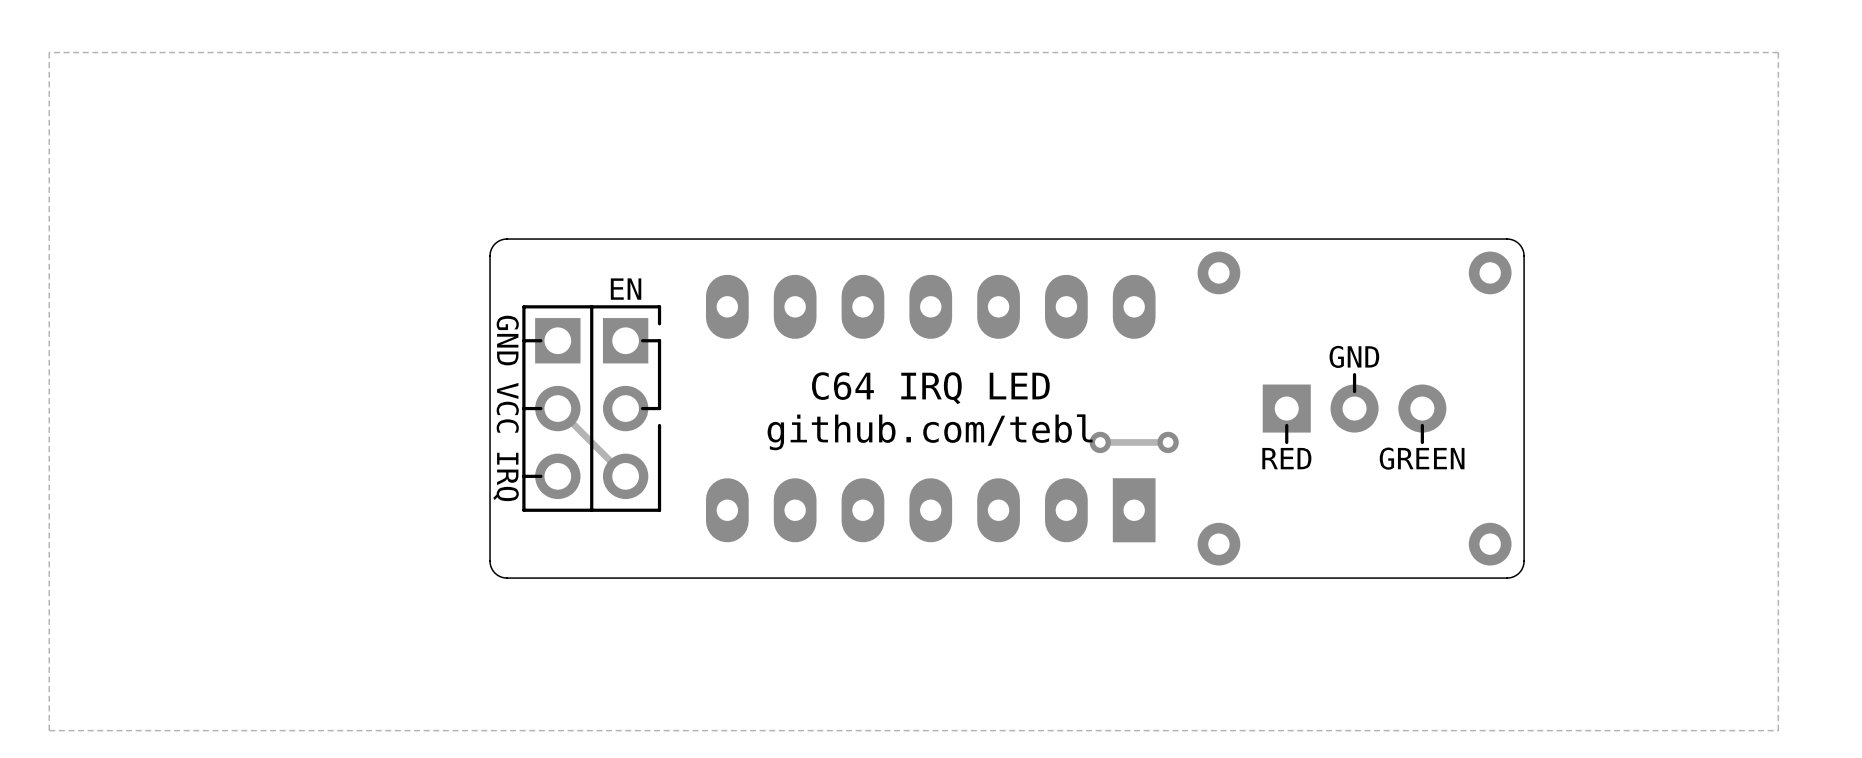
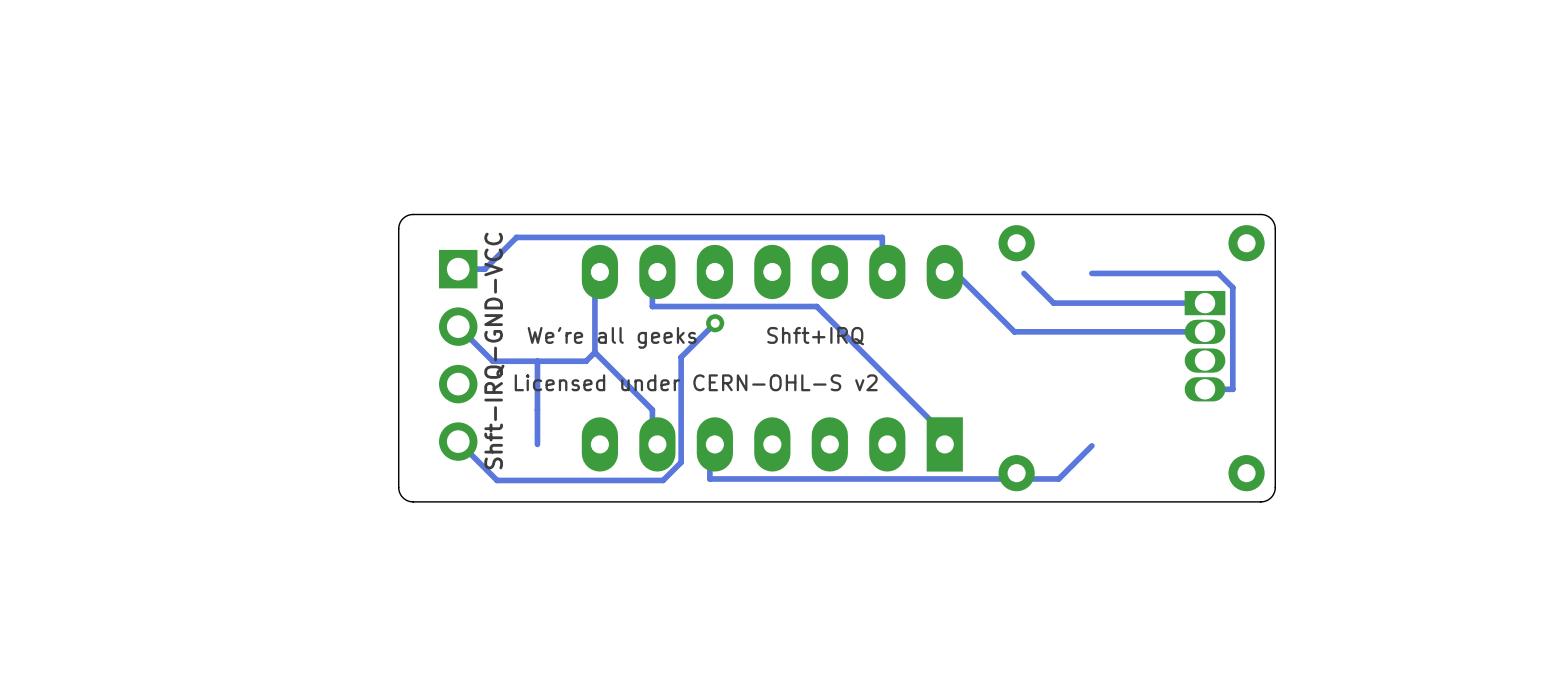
zone outline: (1778, 52) (1778, 730) (49, 730) (49, 52) (1778, 52) -> none
text: EN (626, 289) -> none
track: none -> (458, 269) (484, 269) (516, 237) (882, 237) (882, 271)
line: (591, 306) (591, 510) -> none
track: none -> (594, 271) (594, 352)
track: none -> (652, 271) (652, 306) (816, 306) (956, 445)
track: none -> (956, 273) (1014, 331) (1205, 331)
track: none -> (1023, 273) (1053, 303) (1205, 303)
track: none -> (1091, 273) (1218, 273) (1232, 287) (1232, 389) (1205, 389)
part footprint: [535, 318, 581, 500] -> [439, 249, 478, 461]
line: (659, 323) (659, 306) (523, 306) (523, 510) (659, 510) (659, 425) -> none
text: GND (507, 340) -> none
line: (540, 340) (523, 340) -> none
line: (642, 340) (659, 340) (659, 408) (642, 408) -> none
text: GND (1354, 356) -> none
track: none -> (715, 323) (681, 357) (681, 462) (663, 480) (497, 480) (458, 441)
via: none -> (715, 323)
track: none -> (458, 326) (492, 361) (586, 361) (594, 352)
line: (1354, 374) (1354, 391) -> none
text: none -> We're all geeks Shft+IRQ (695, 337)
text: C64 IRQ LED (930, 388) -> none
part: none -> (1205, 346)
track: none -> (594, 352) (652, 409) (652, 444)
text: VCC (507, 407) -> none
line: (540, 408) (523, 408) -> none
track: (557, 408) (625, 476) -> none
part: (625, 408) -> none
part: (1354, 408) -> none
track: none -> (537, 361) (537, 444)
text: none -> Shft-IRQ-GND-VCC (494, 351)
line: (1286, 425) (1286, 442) -> none
line: (1422, 425) (1422, 442) -> none
text: github.com/tebl (930, 432) -> none
text: none -> Licensed under CERN-OHL-S v2 (696, 382)
via: (1100, 442) -> none
track: (1168, 442) (1100, 442) -> none
via: (1168, 442) -> none
text: RED (1286, 458) -> none
text: GREEN (1422, 458) -> none
text: IRQ (506, 476) -> none
line: (540, 476) (523, 476) -> none
track: none -> (709, 444) (709, 478) (1058, 478) (1091, 445)

